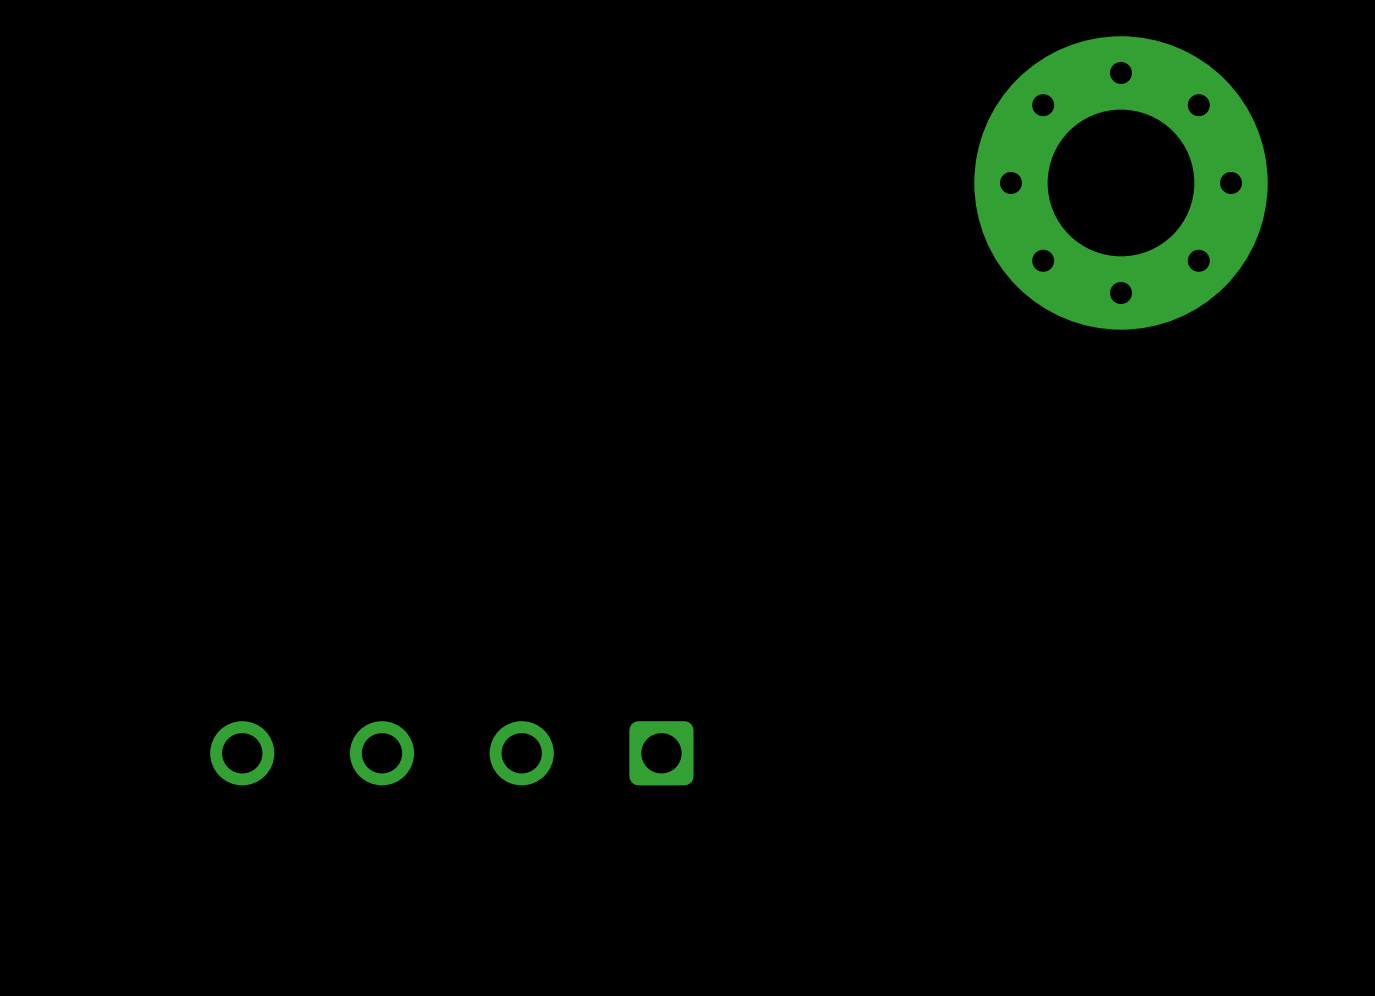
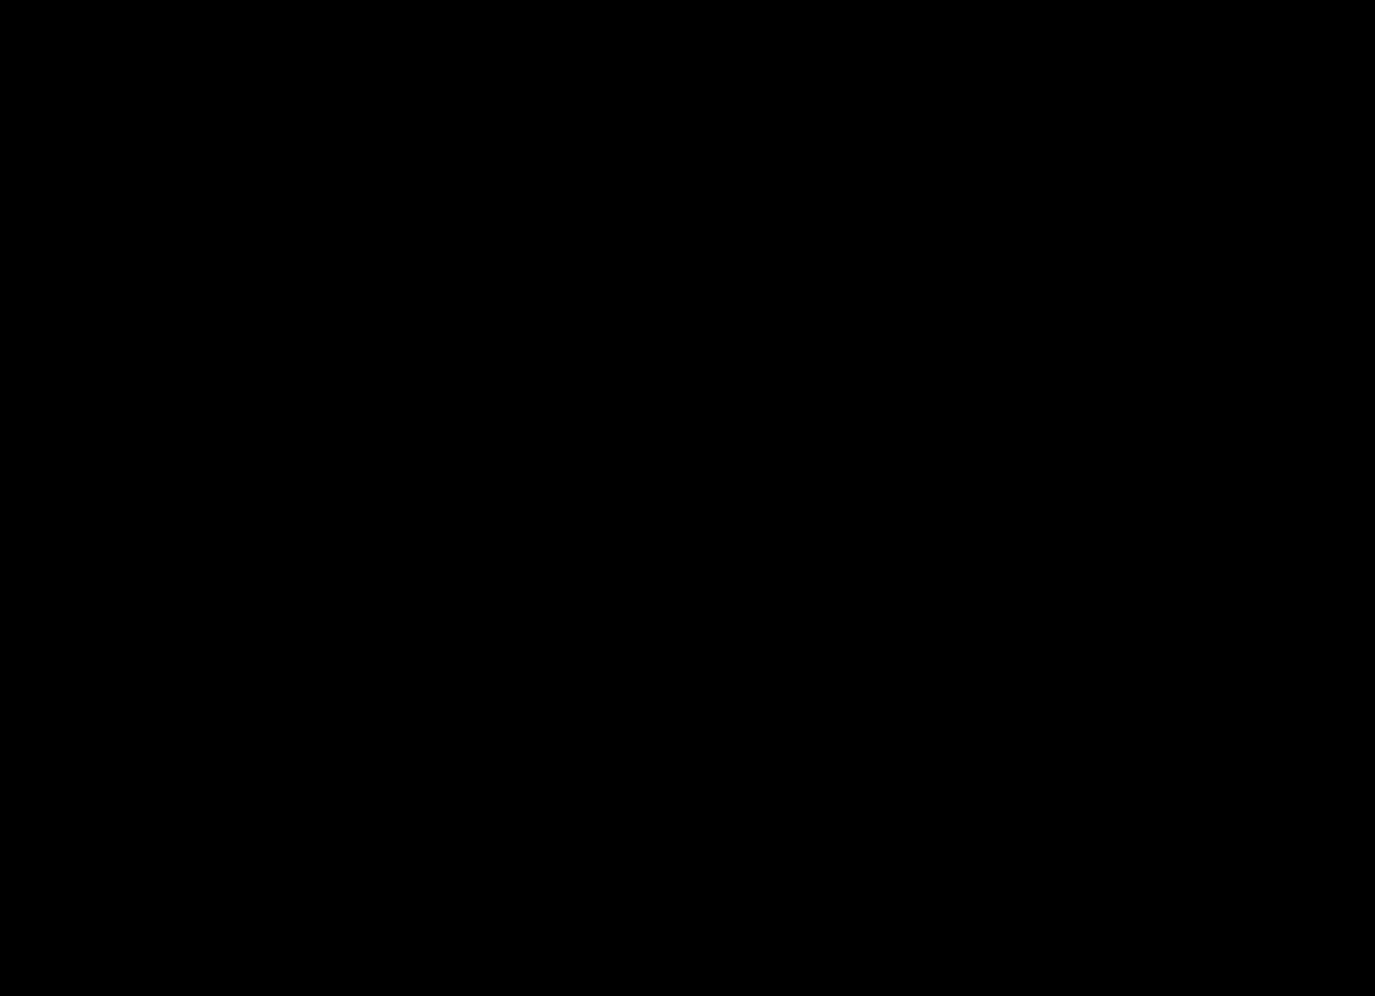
part: (1120, 182) -> none
part: (451, 753) -> none

